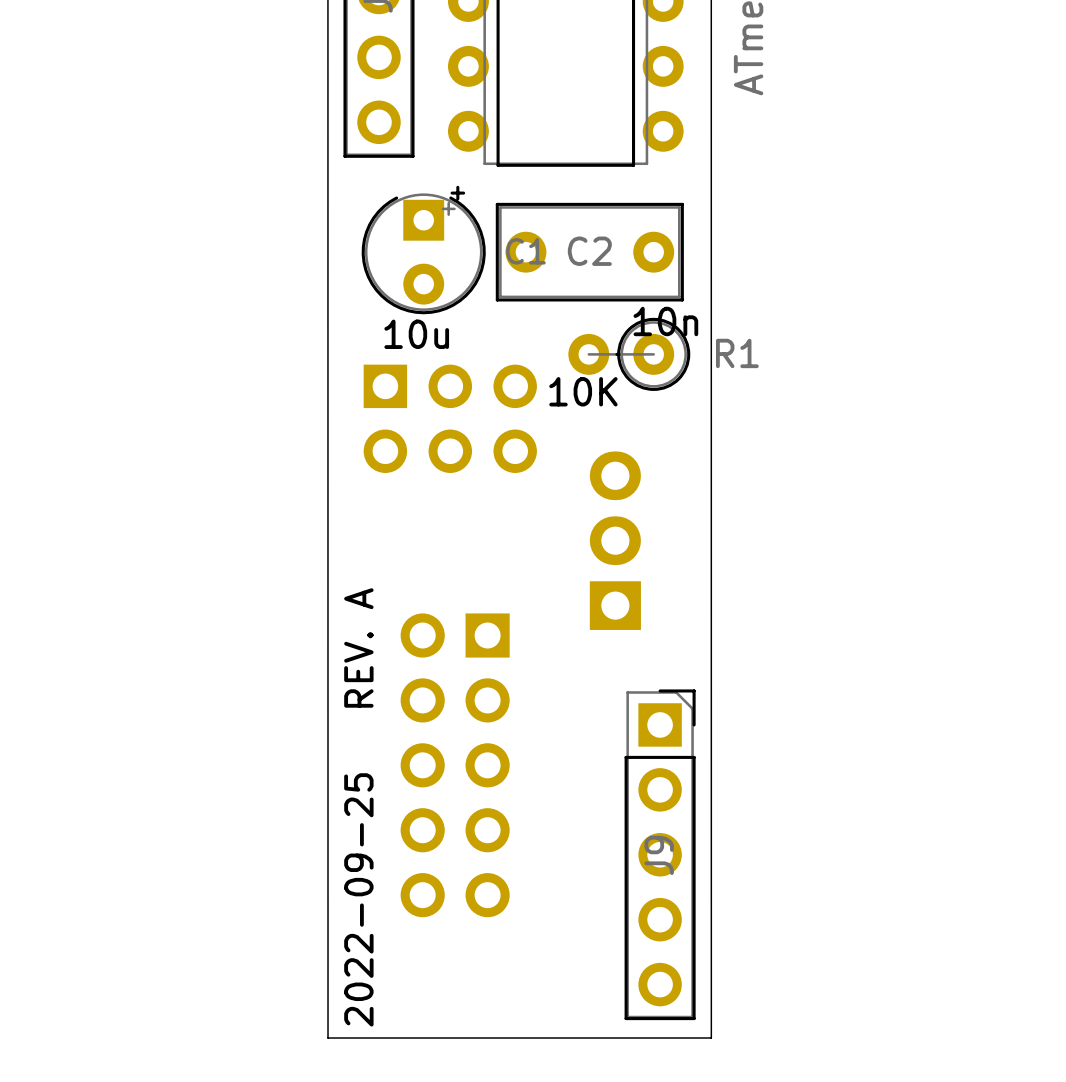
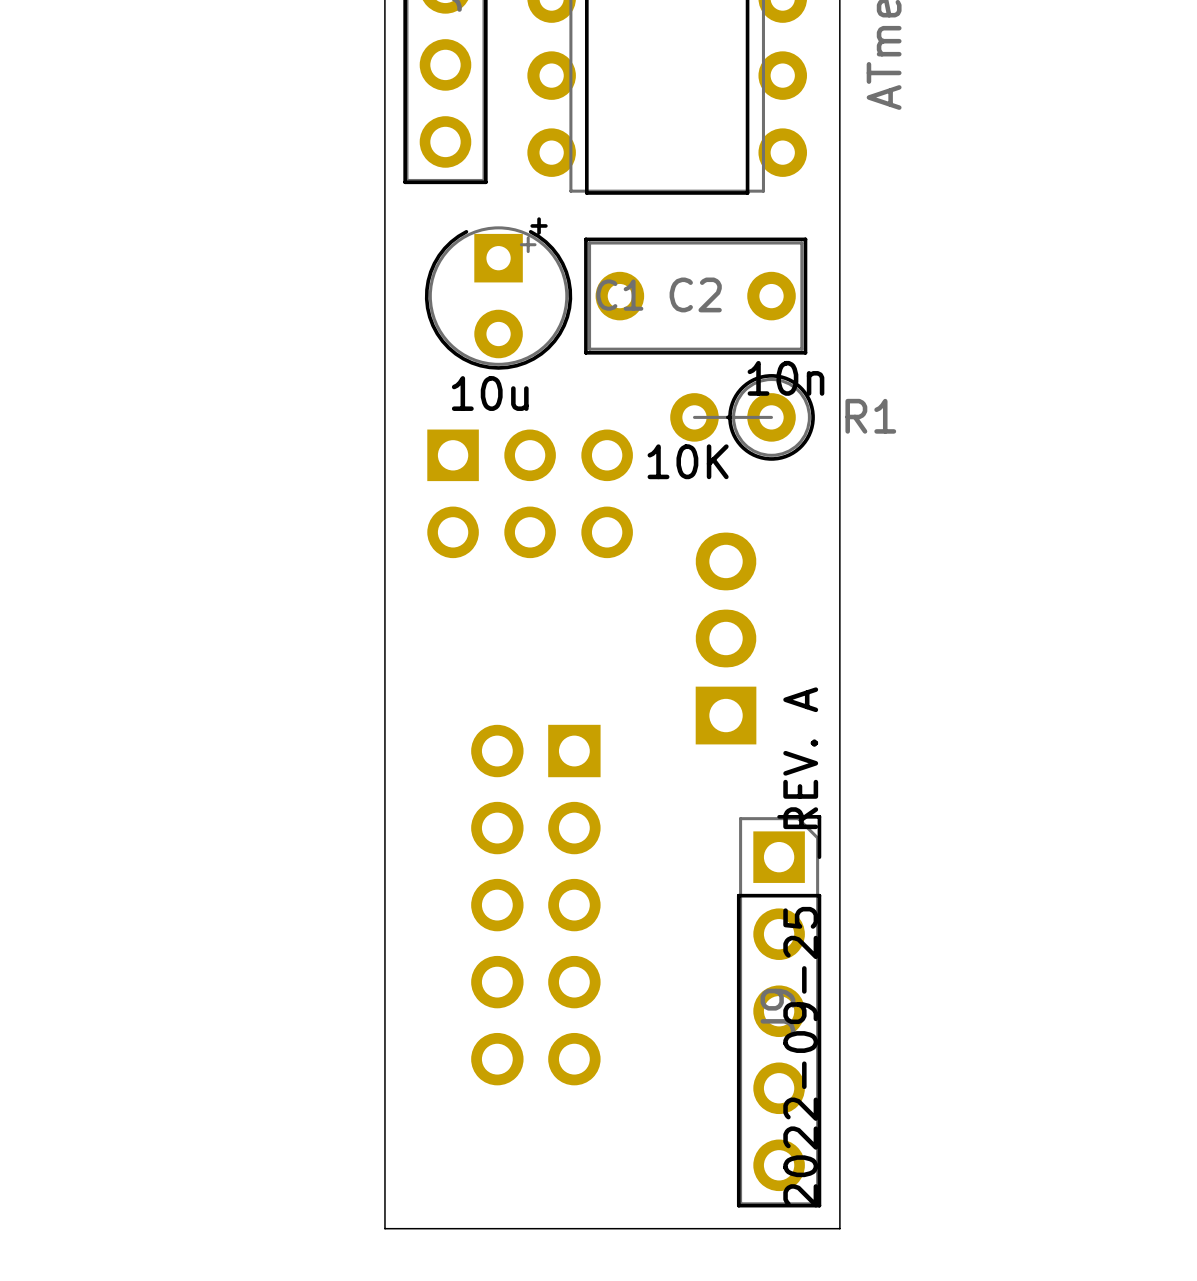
text position: 2022-09-25 REV. A (358, 807) -> 2022-09-25 REV. A (800, 947)

